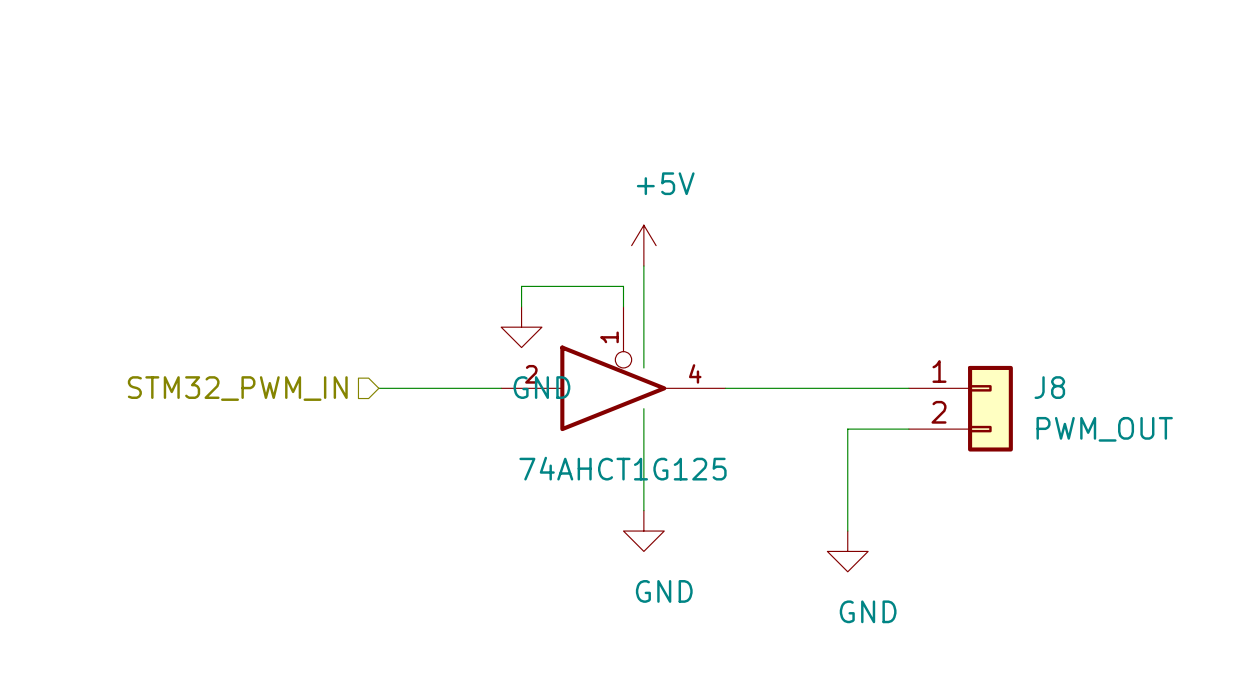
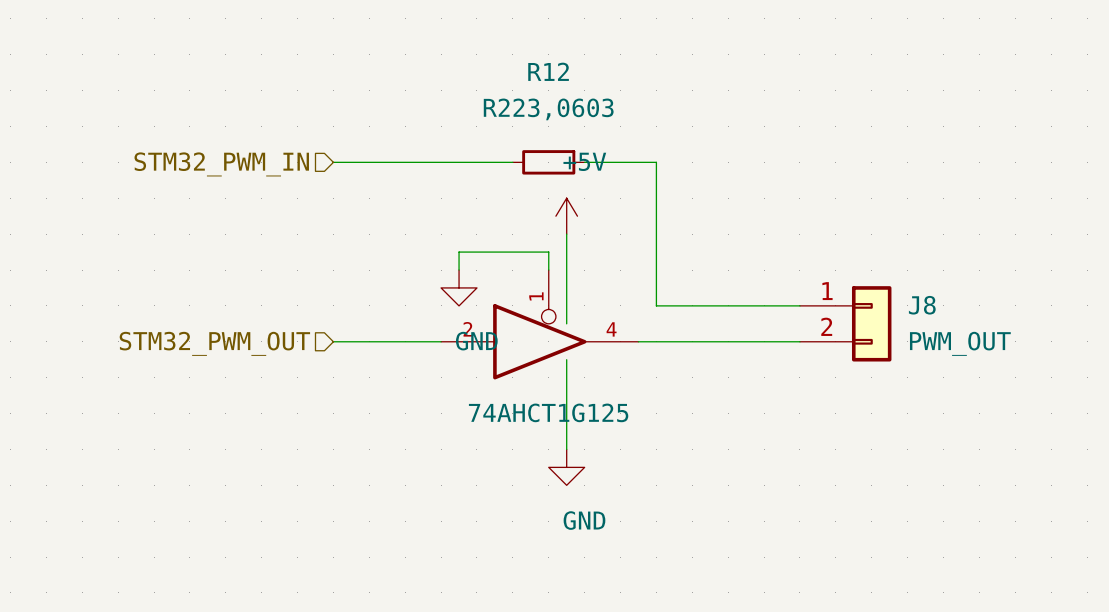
hierarchical label: none -> STM32_PWM_IN (221, 164)
wire: none -> (333, 162) (512, 162)
R12: none -> R223,0603 (548, 162)
wire: none -> (584, 162) (656, 162) (656, 305) (799, 305)
hierarchical label: STM32_PWM_IN (237, 388) -> STM32_PWM_OUT (214, 343)
J8 position: (960, 408) -> (845, 323)
wire: (908, 429) (847, 429) (847, 531) -> none
power symbol: GND (847, 551) -> none

